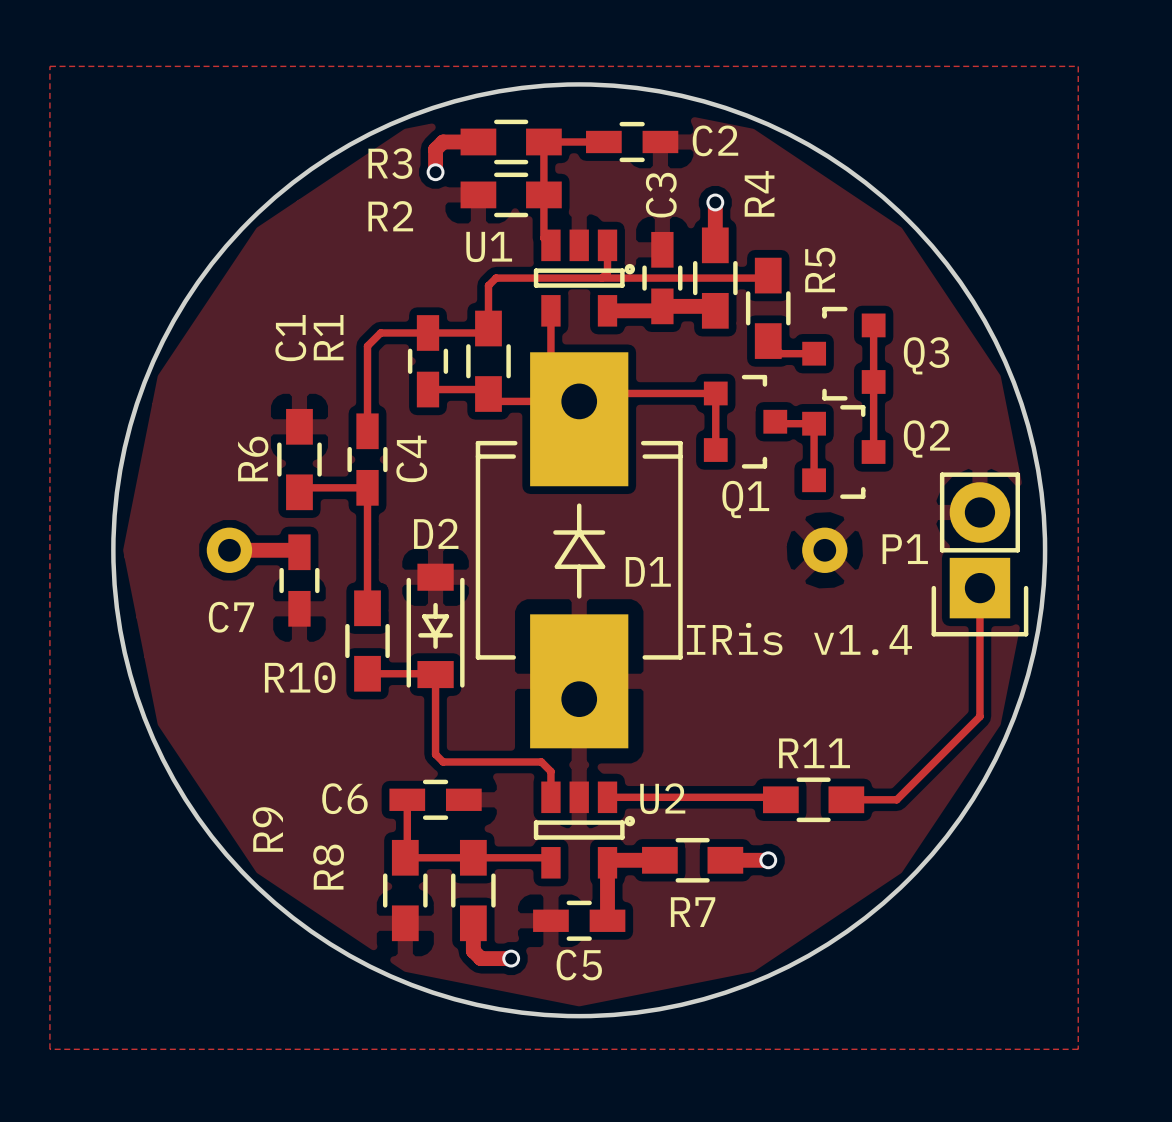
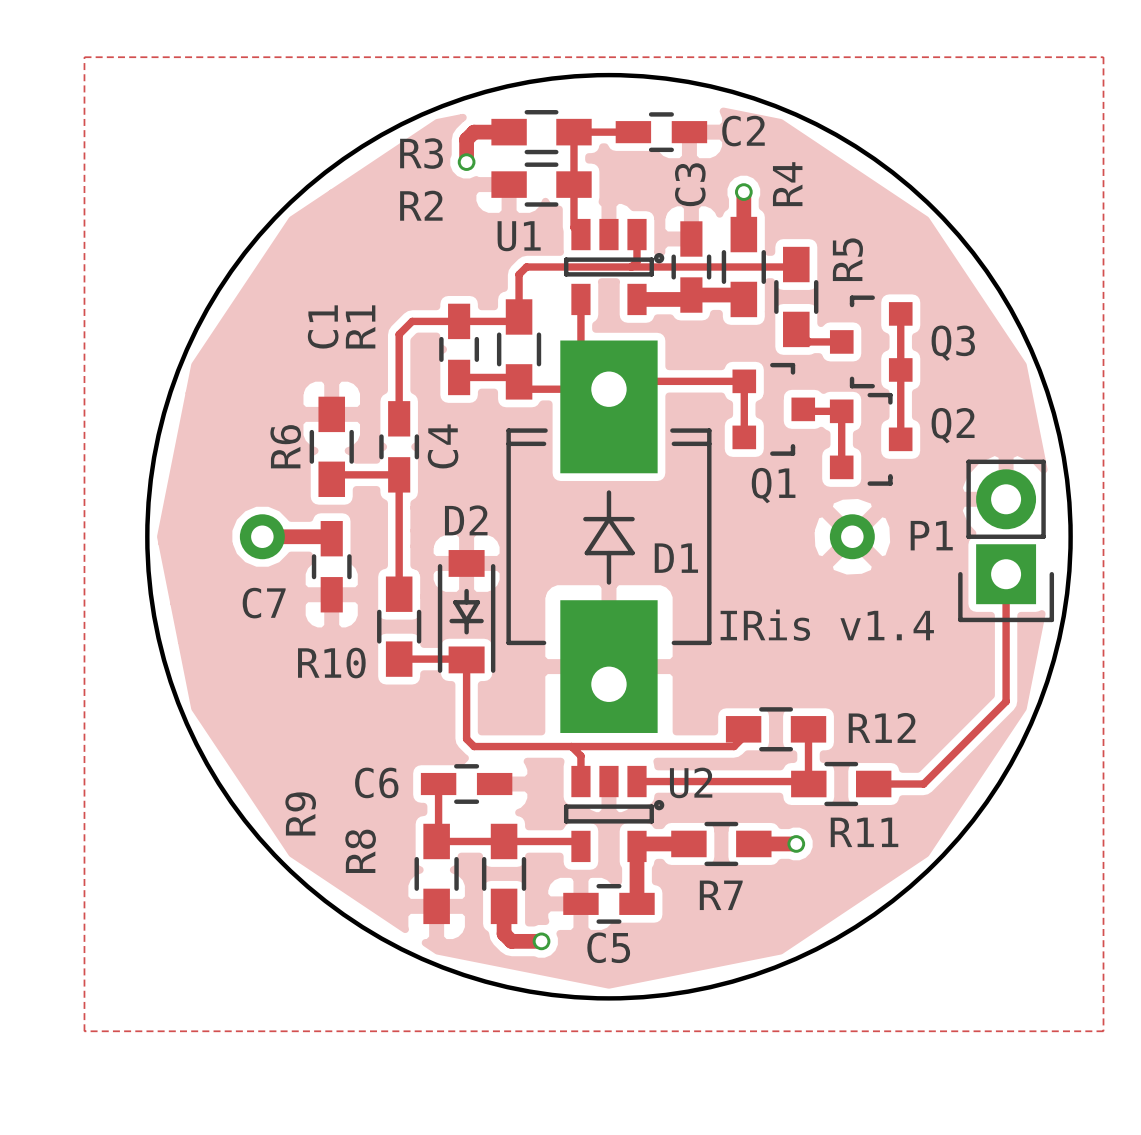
track: none -> (743, 729) (743, 737) (734, 746) (571, 746)
R12: none -> (776, 729)
track: none -> (808, 729) (808, 783)
R11 name position: R11 (814, 753) -> R11 (864, 832)

